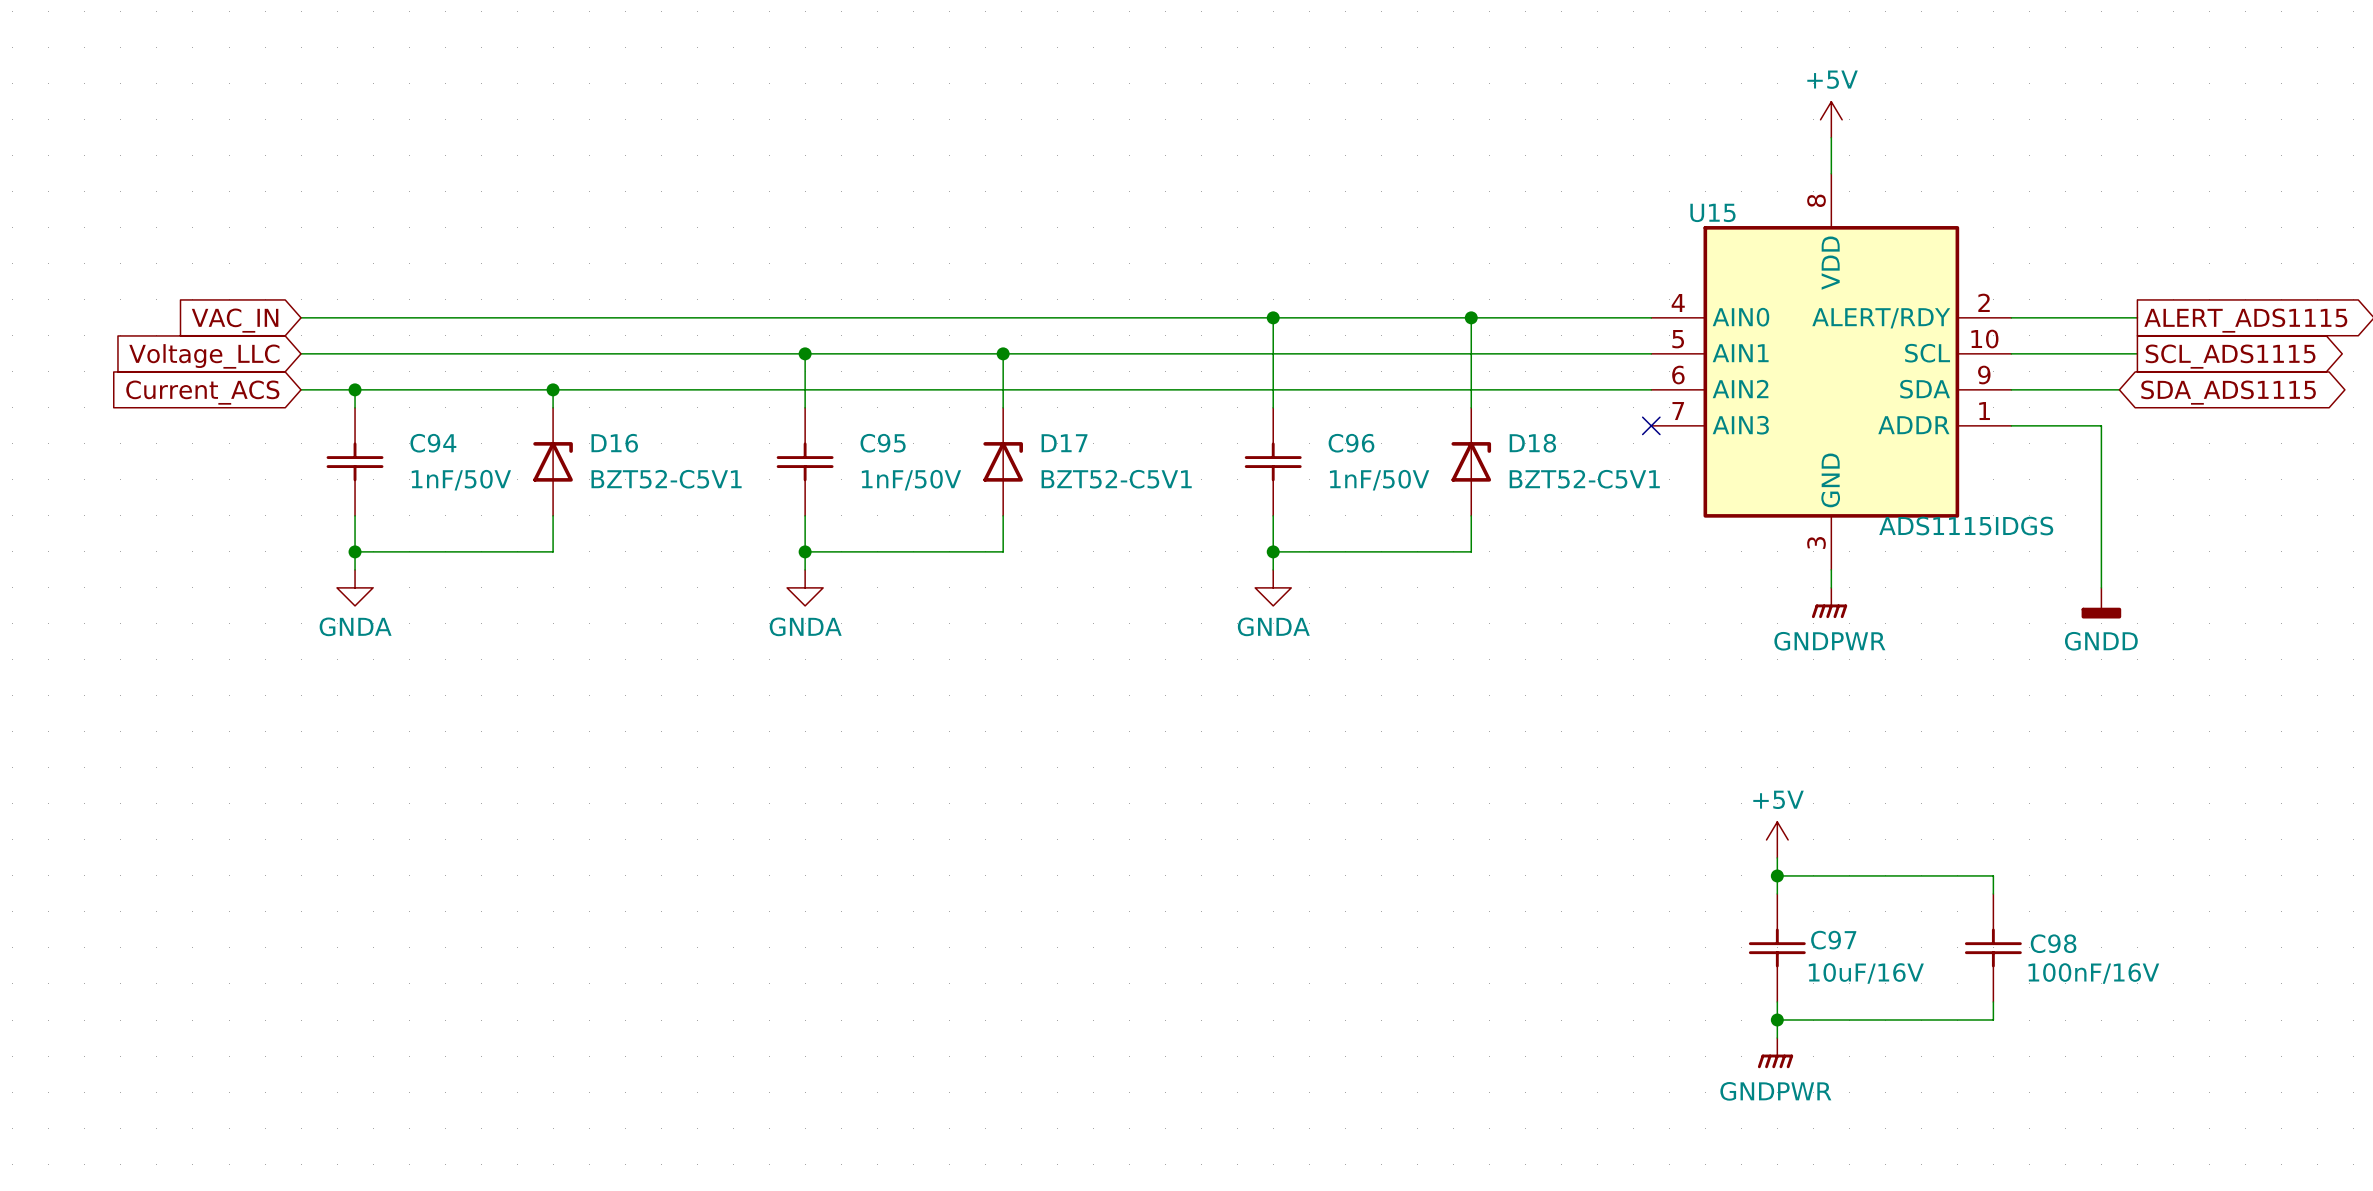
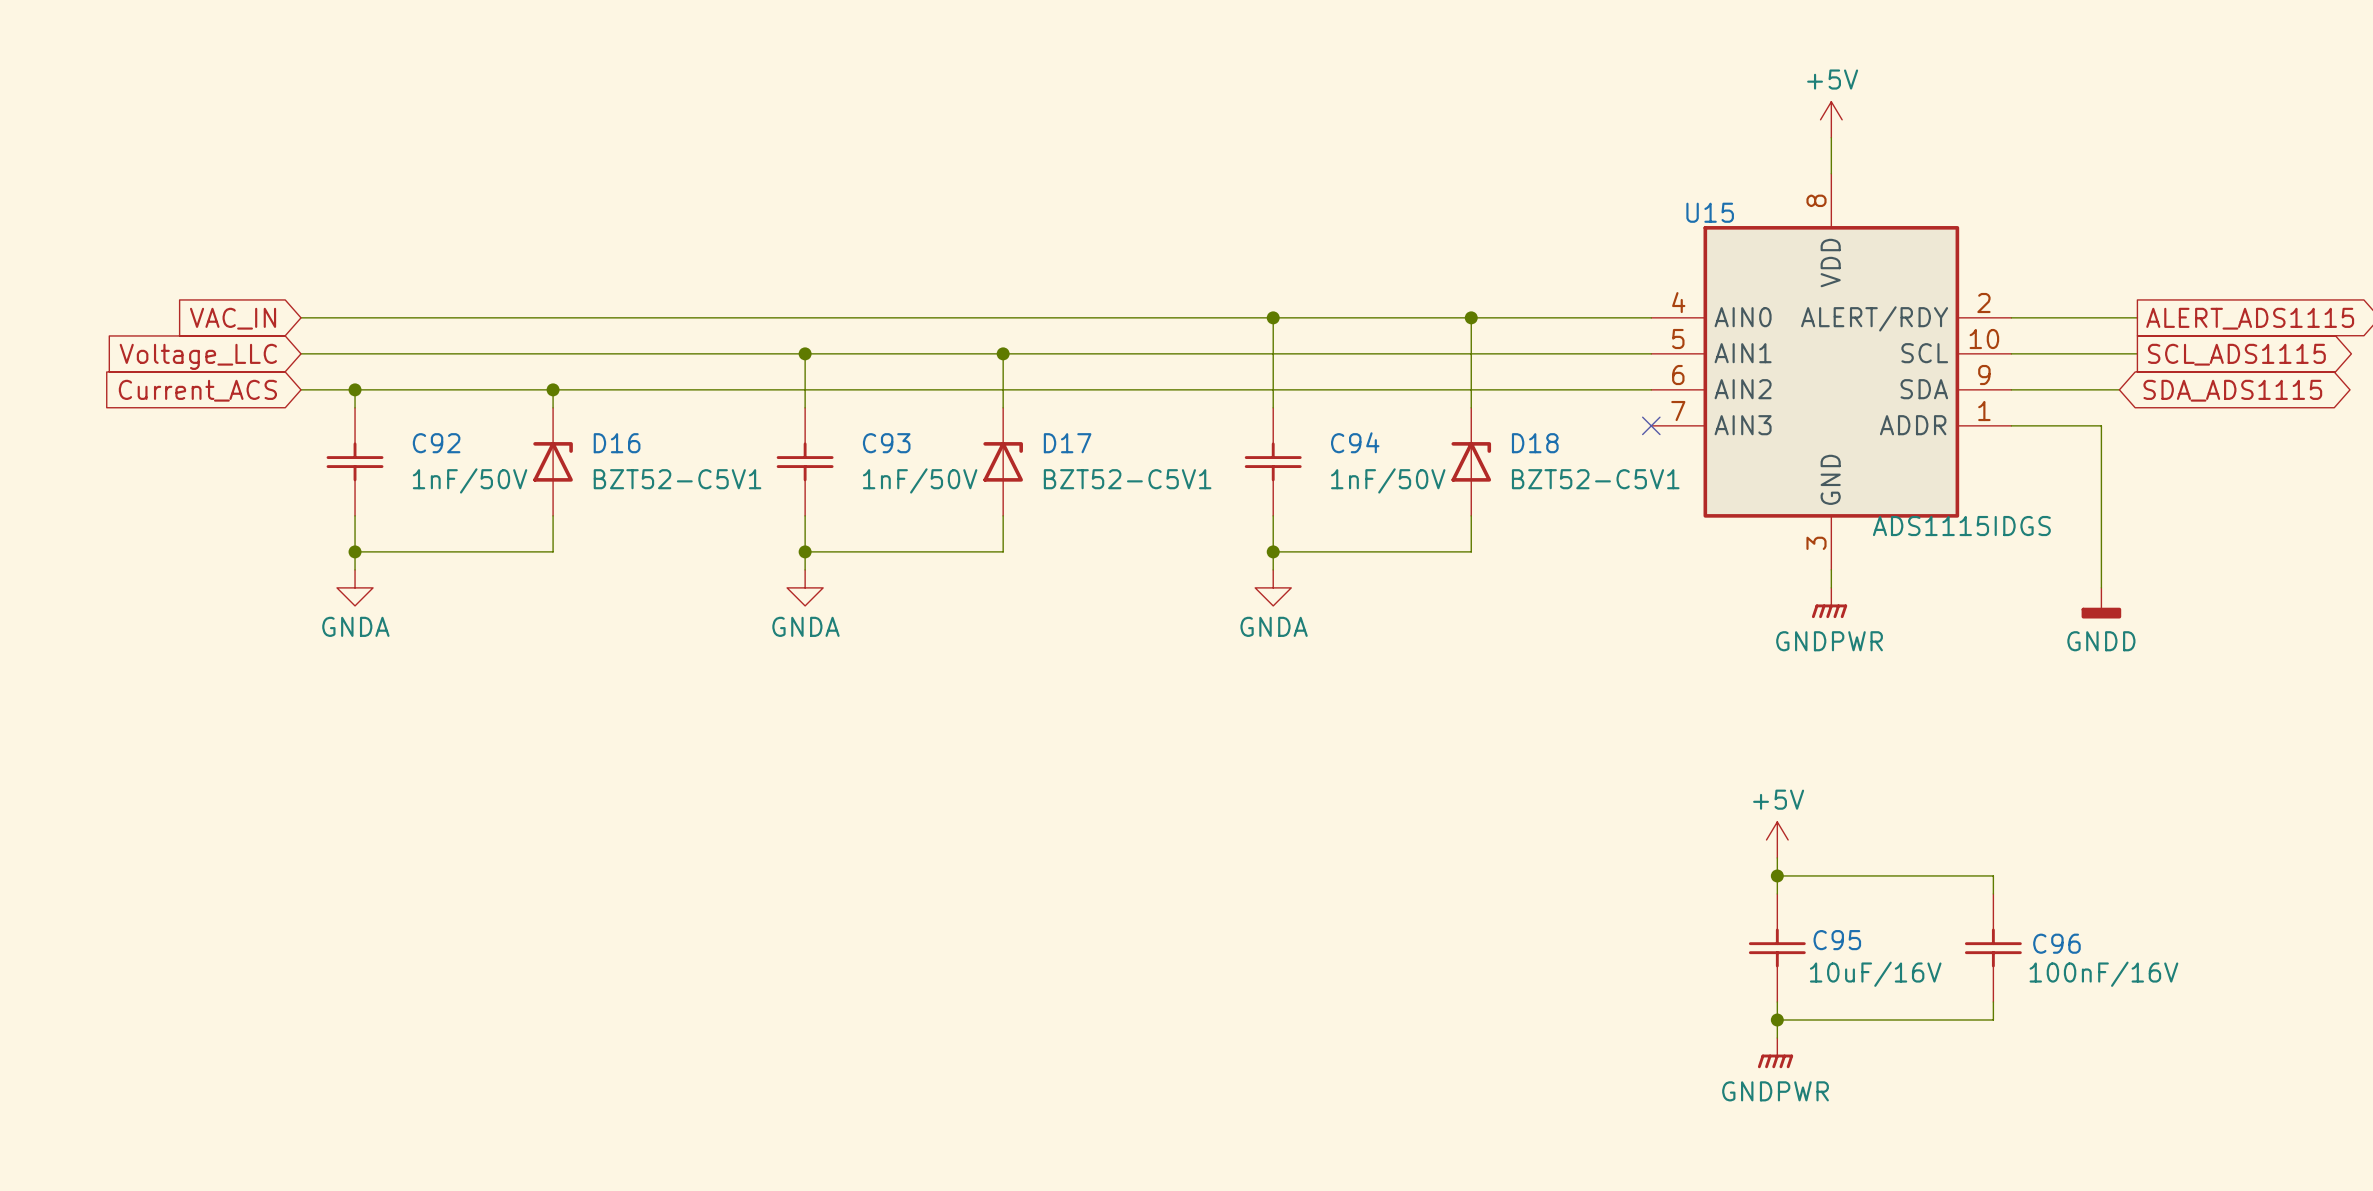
C94 name: C94 (433, 443) -> C92 (436, 443)
C95 name: C95 (883, 443) -> C93 (886, 443)
C96 name: C96 (1351, 443) -> C94 (1355, 442)
C97 name: C97 (1833, 940) -> C95 (1837, 940)
C98 name: C98 (2053, 943) -> C96 (2056, 943)

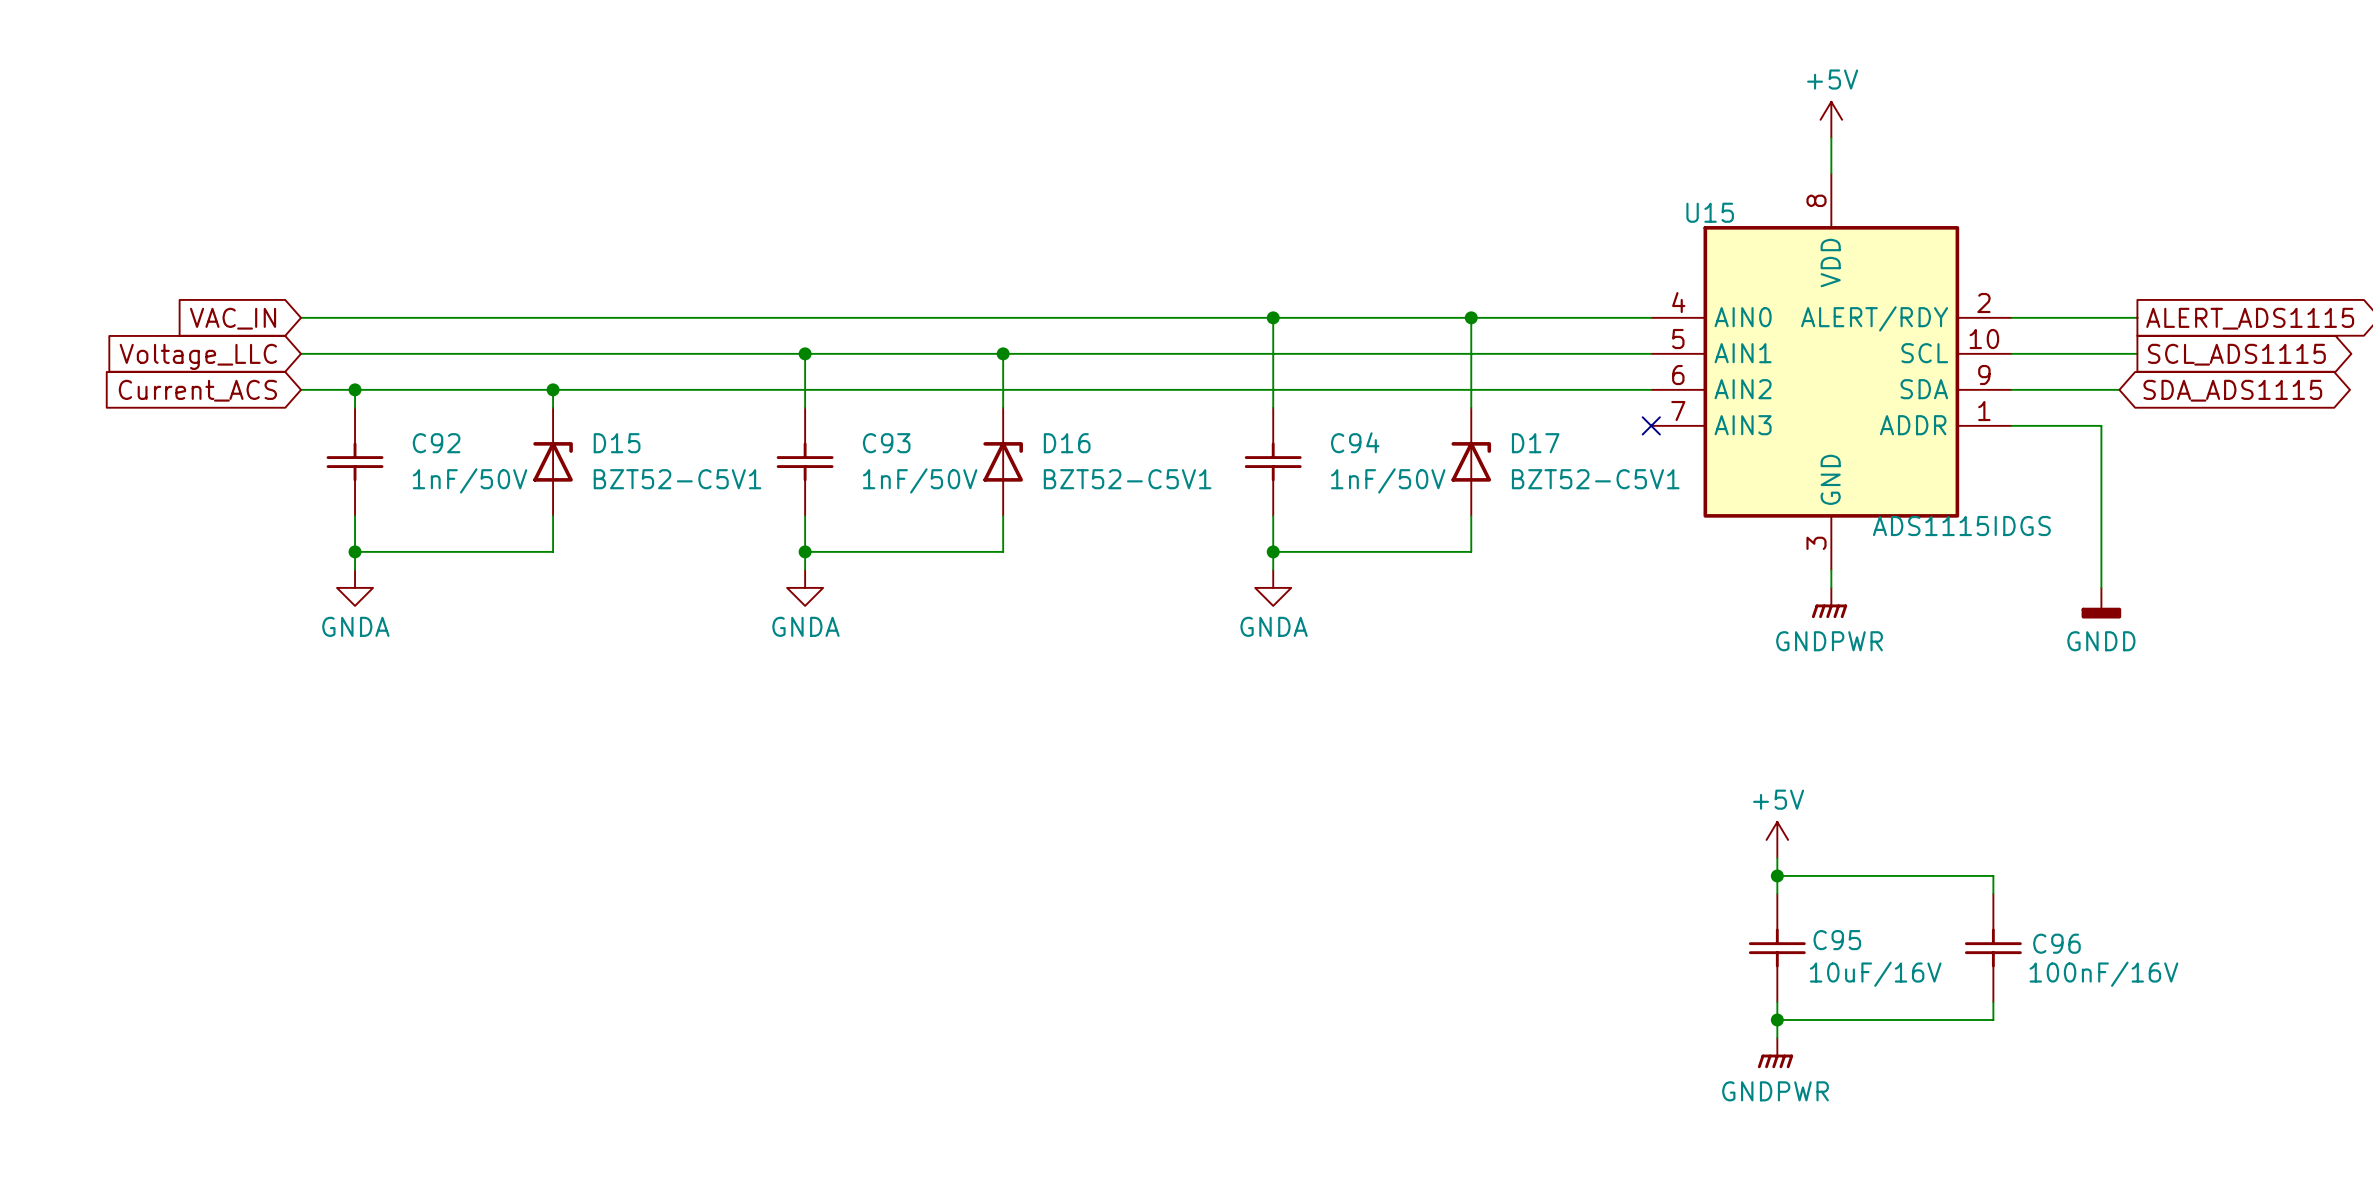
D16 name: D16 (617, 443) -> D15 (617, 443)
D17 name: D17 (1067, 443) -> D16 (1067, 443)
D18 name: D18 (1535, 443) -> D17 (1535, 443)

